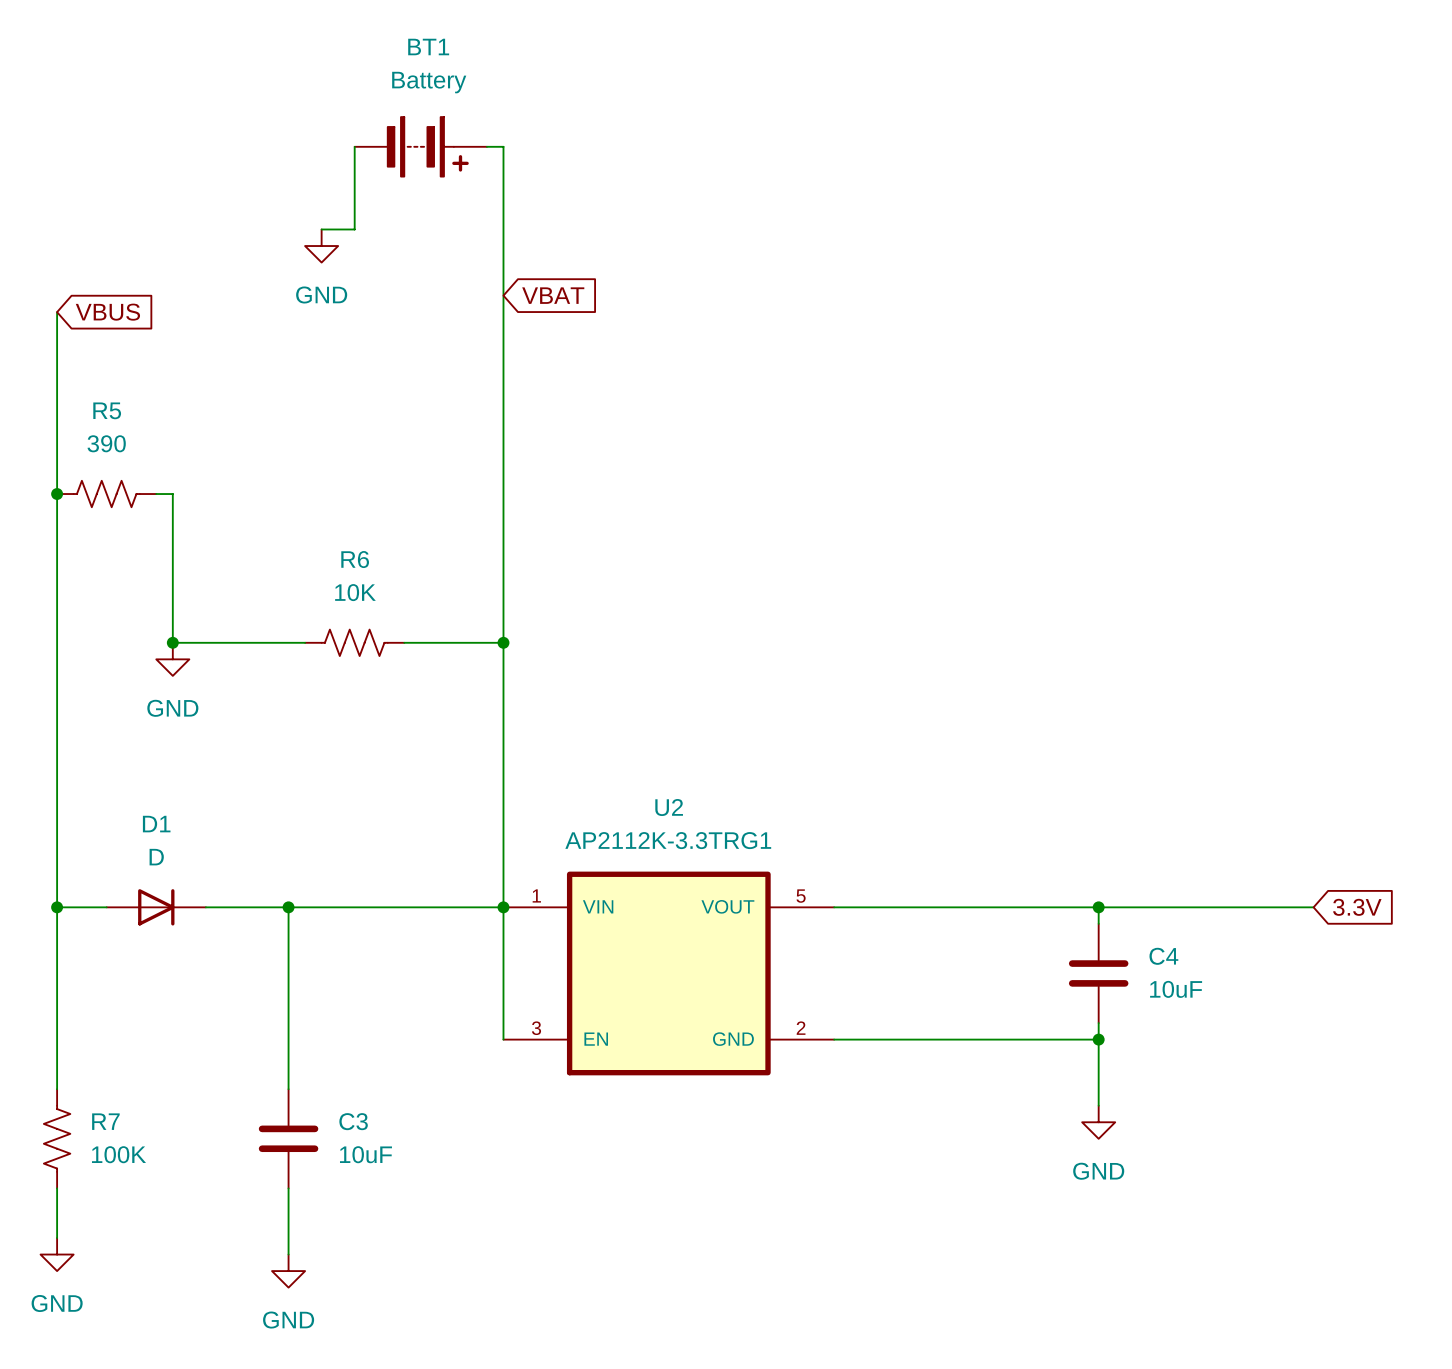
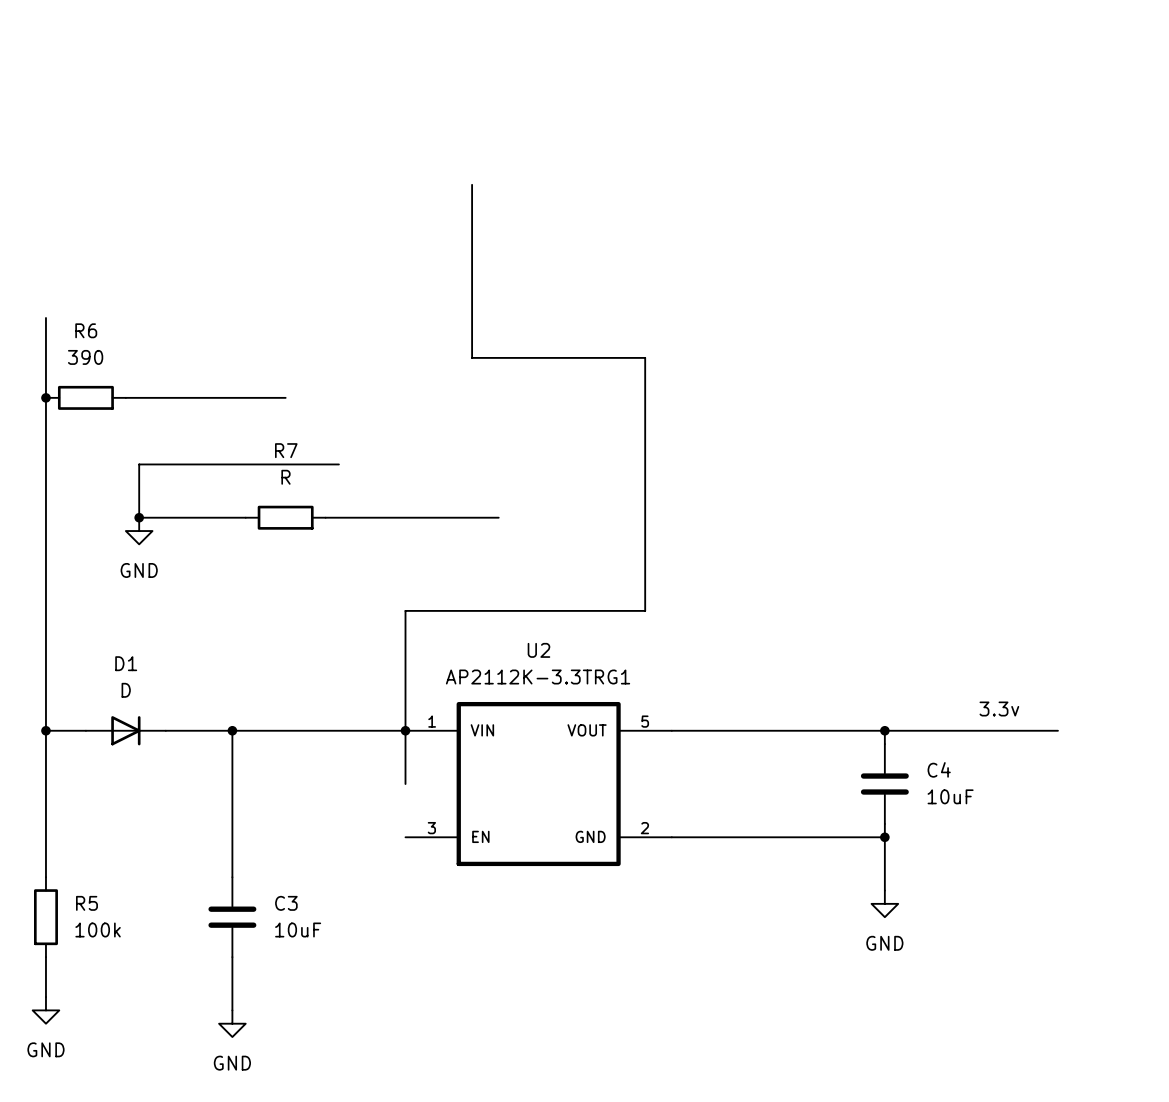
wire: (354, 146) (354, 229) (321, 229) -> none
BT1: Battery (420, 146) -> none
wire: (486, 146) (503, 146) (503, 758) -> (472, 184) (472, 357) (645, 357) (645, 610) (405, 610)
power symbol: GND (321, 246) -> none
global label: VBAT (553, 295) -> none
wire: (57, 312) (57, 394) -> none
global label: VBUS (107, 312) -> none
R5 name position: R5 (107, 410) -> R5 (86, 903)
R5 value: 390 (106, 443) -> 100k (98, 930)
R5 symbol: [57, 480, 157, 508] -> [34, 877, 58, 958]
wire: (172, 494) (172, 576) -> (139, 397) (285, 397)
wire: none -> (139, 464) (338, 464)
R6 value: 10K (355, 592) -> 390 (85, 357)
R6 symbol: [305, 629, 405, 657] -> [45, 385, 126, 410]
wire: none -> (405, 517) (498, 517)
junction: (503, 642) -> none
text: none -> 3.3v (999, 709)
global label: 3.3V (1357, 907) -> none
wire: (503, 973) (503, 1039) -> none
R7 symbol: [43, 1089, 71, 1189] -> [245, 505, 326, 530]
R7 name position: R7 (105, 1121) -> R7 (286, 450)
R7 value: 100K (119, 1154) -> R (285, 477)

